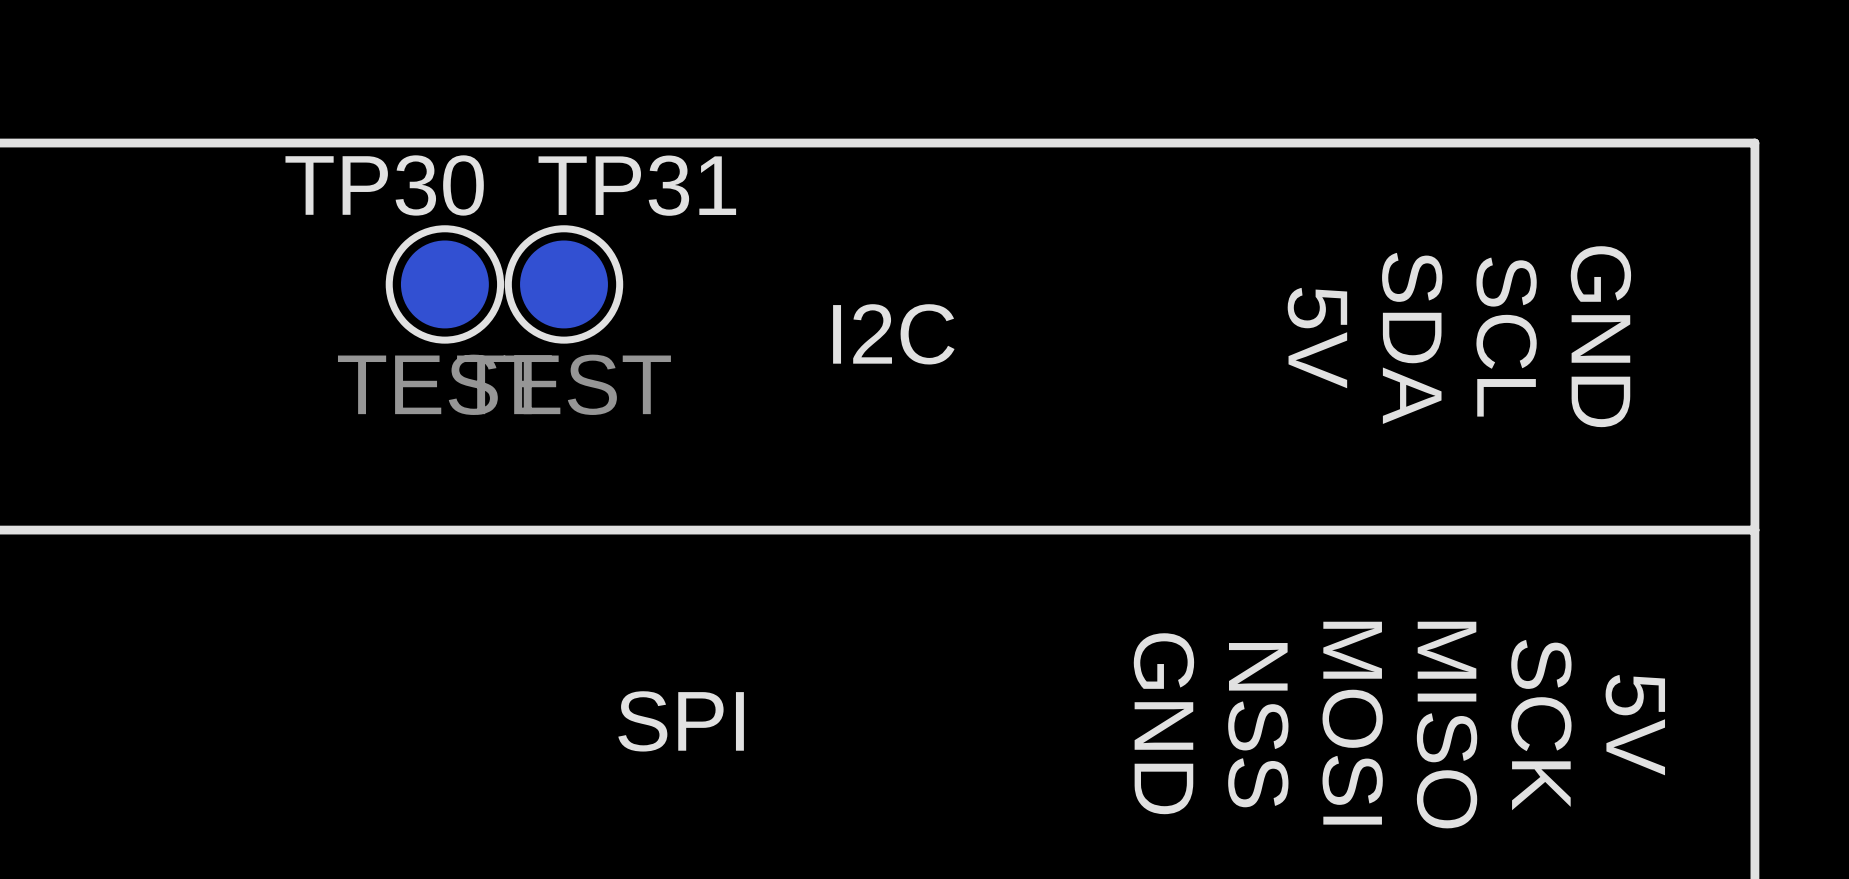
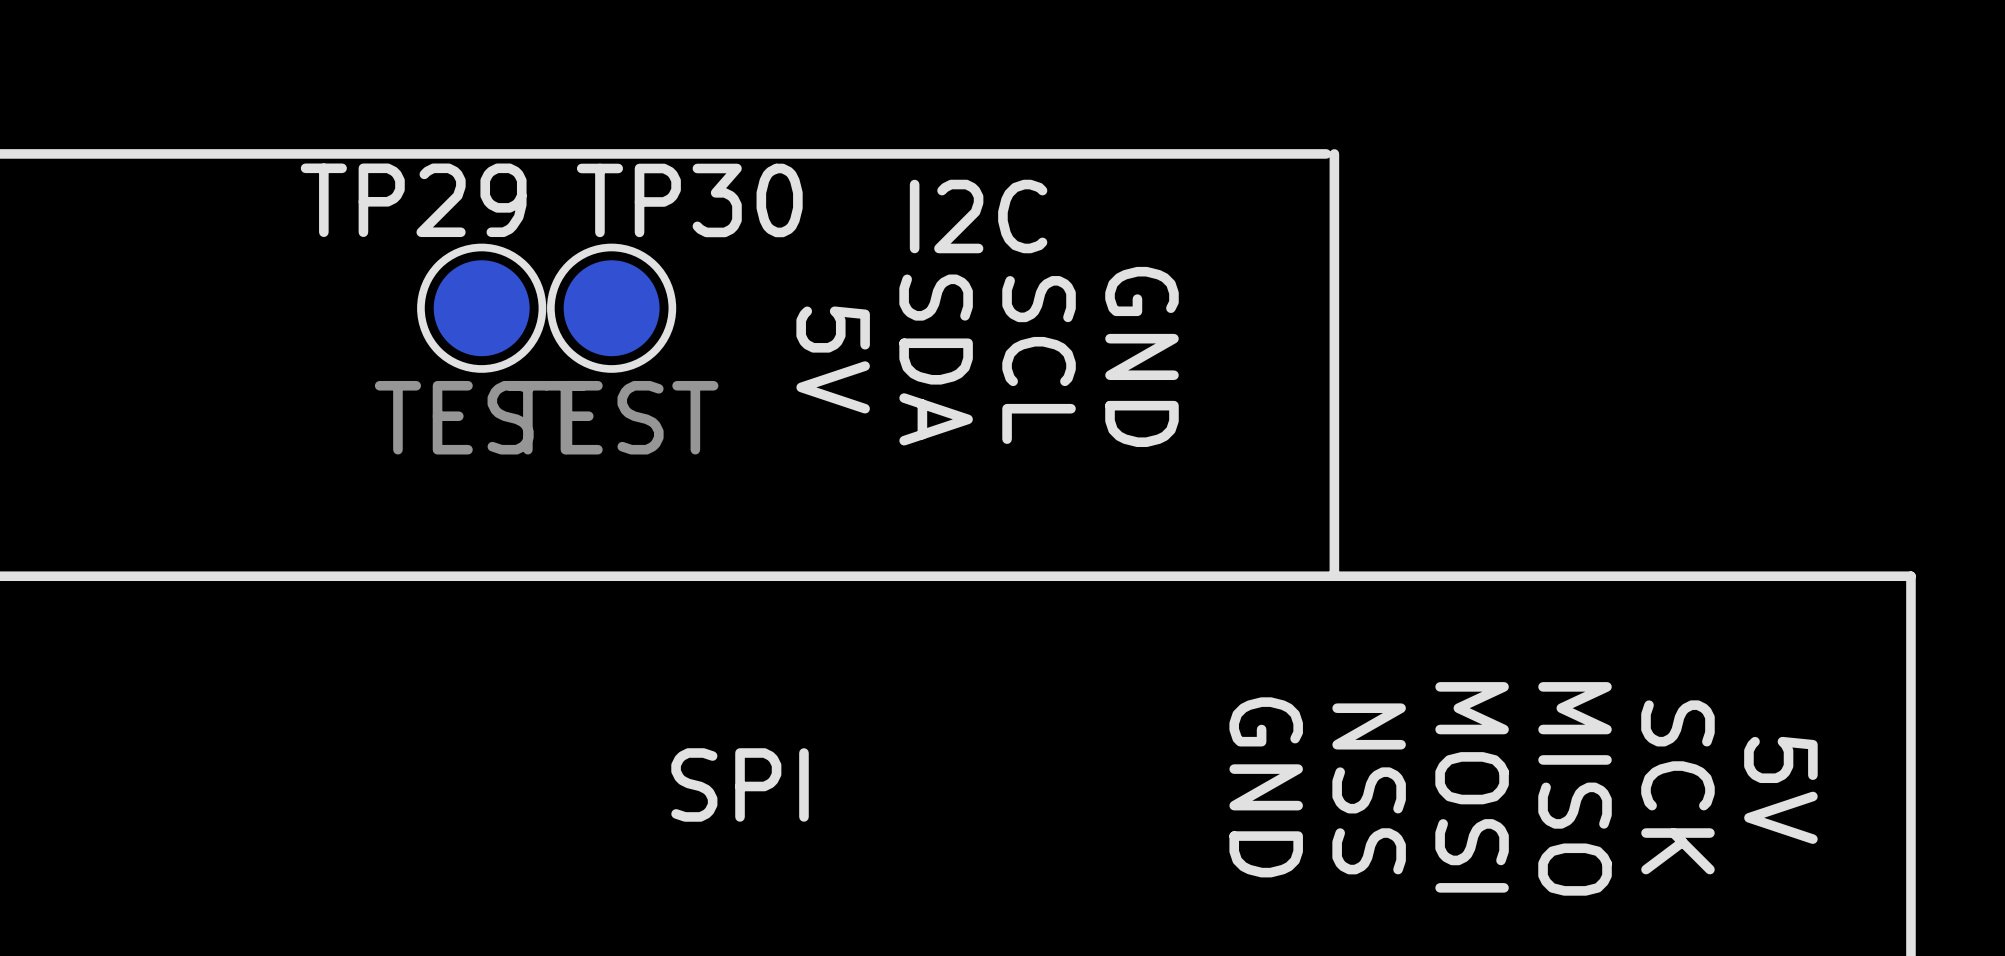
line: (1219, 143) (1754, 143) (1754, 530) -> none
line: none -> (1334, 153) (1334, 576)
TP30 name: TP30 (384, 185) -> TP29 (413, 200)
TP31 name: TP31 (637, 185) -> TP30 (689, 200)
text position: I2C (893, 334) -> I2C (978, 216)
text position: GND (1600, 336) -> GND (1141, 356)
text position: SCL (1506, 337) -> SCL (1039, 359)
text position: 5V (1317, 338) -> 5V (833, 359)
text position: SDA (1412, 338) -> SDA (936, 359)

